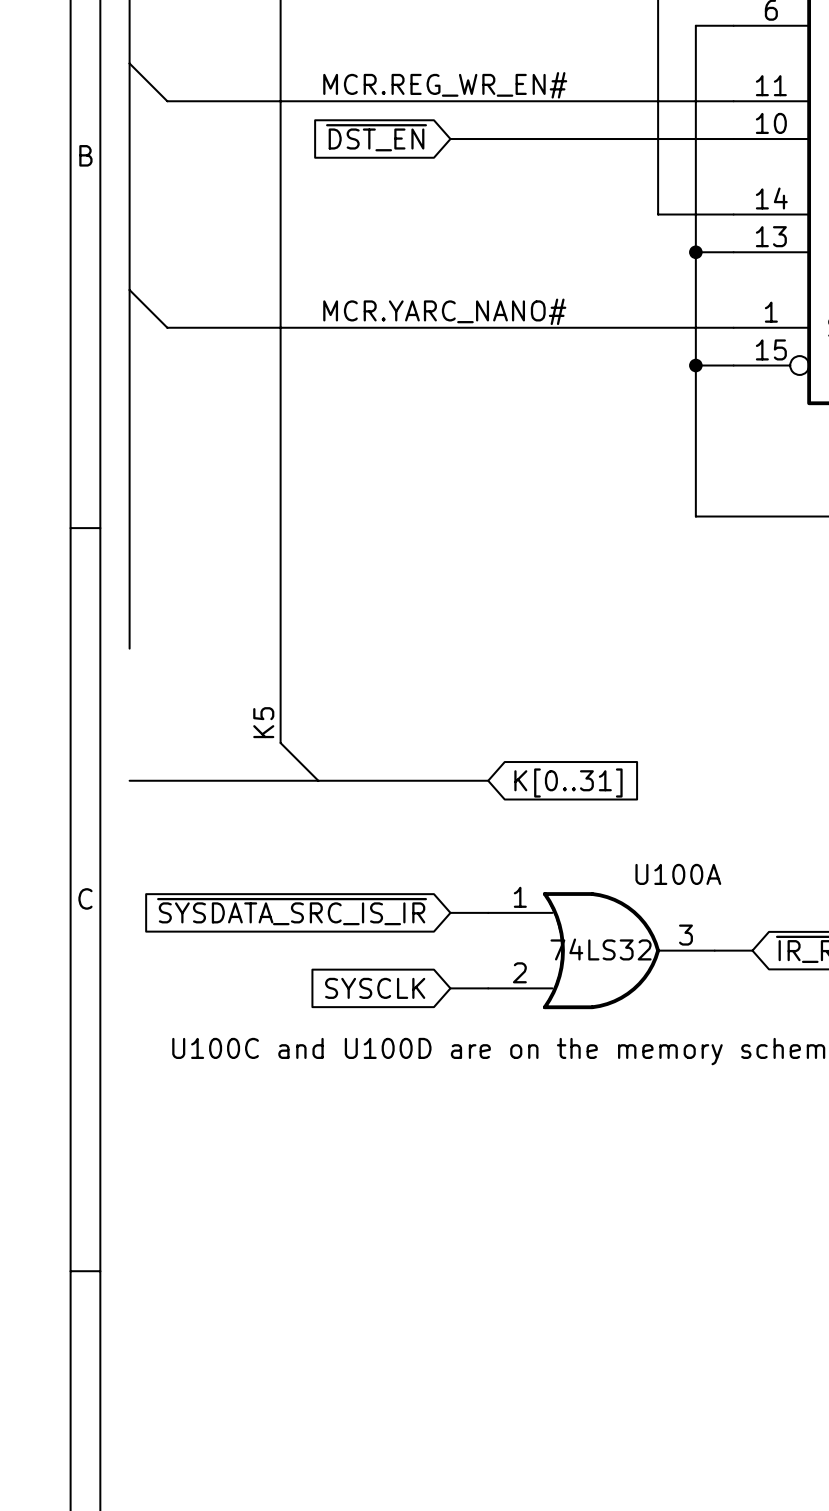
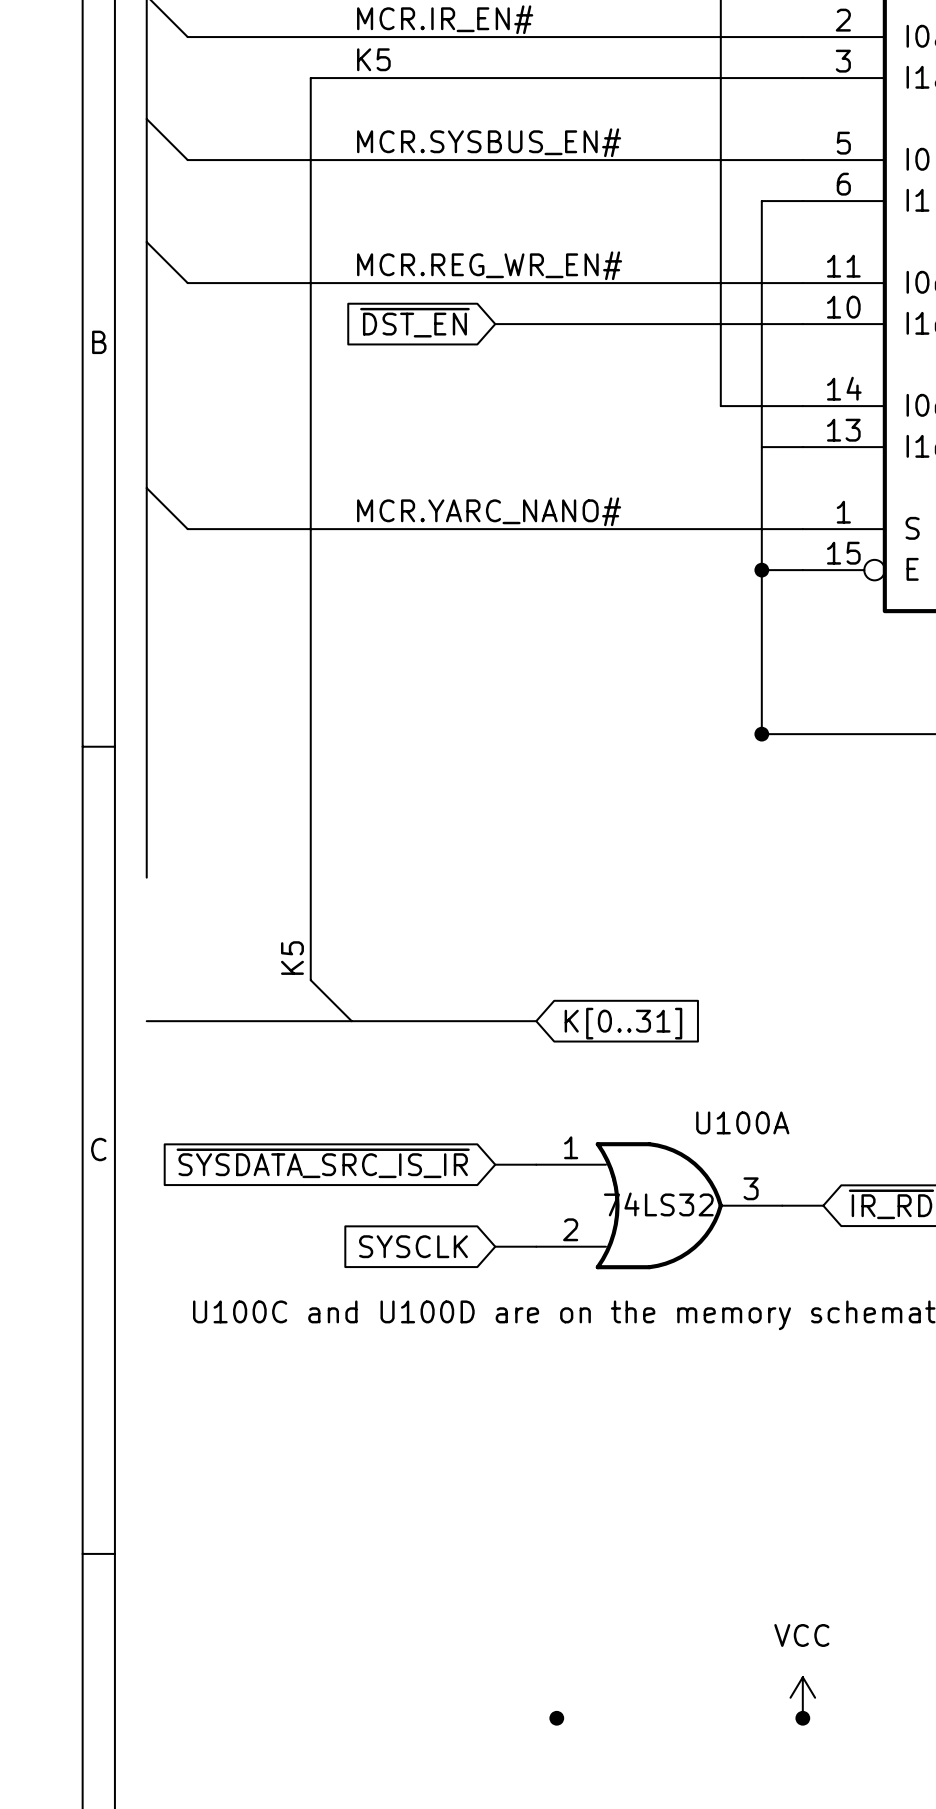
junction: (695, 252) -> none
junction: none -> (761, 734)
power symbol: none -> VCC (802, 1697)
junction: none -> (556, 1718)
junction: none -> (802, 1718)

